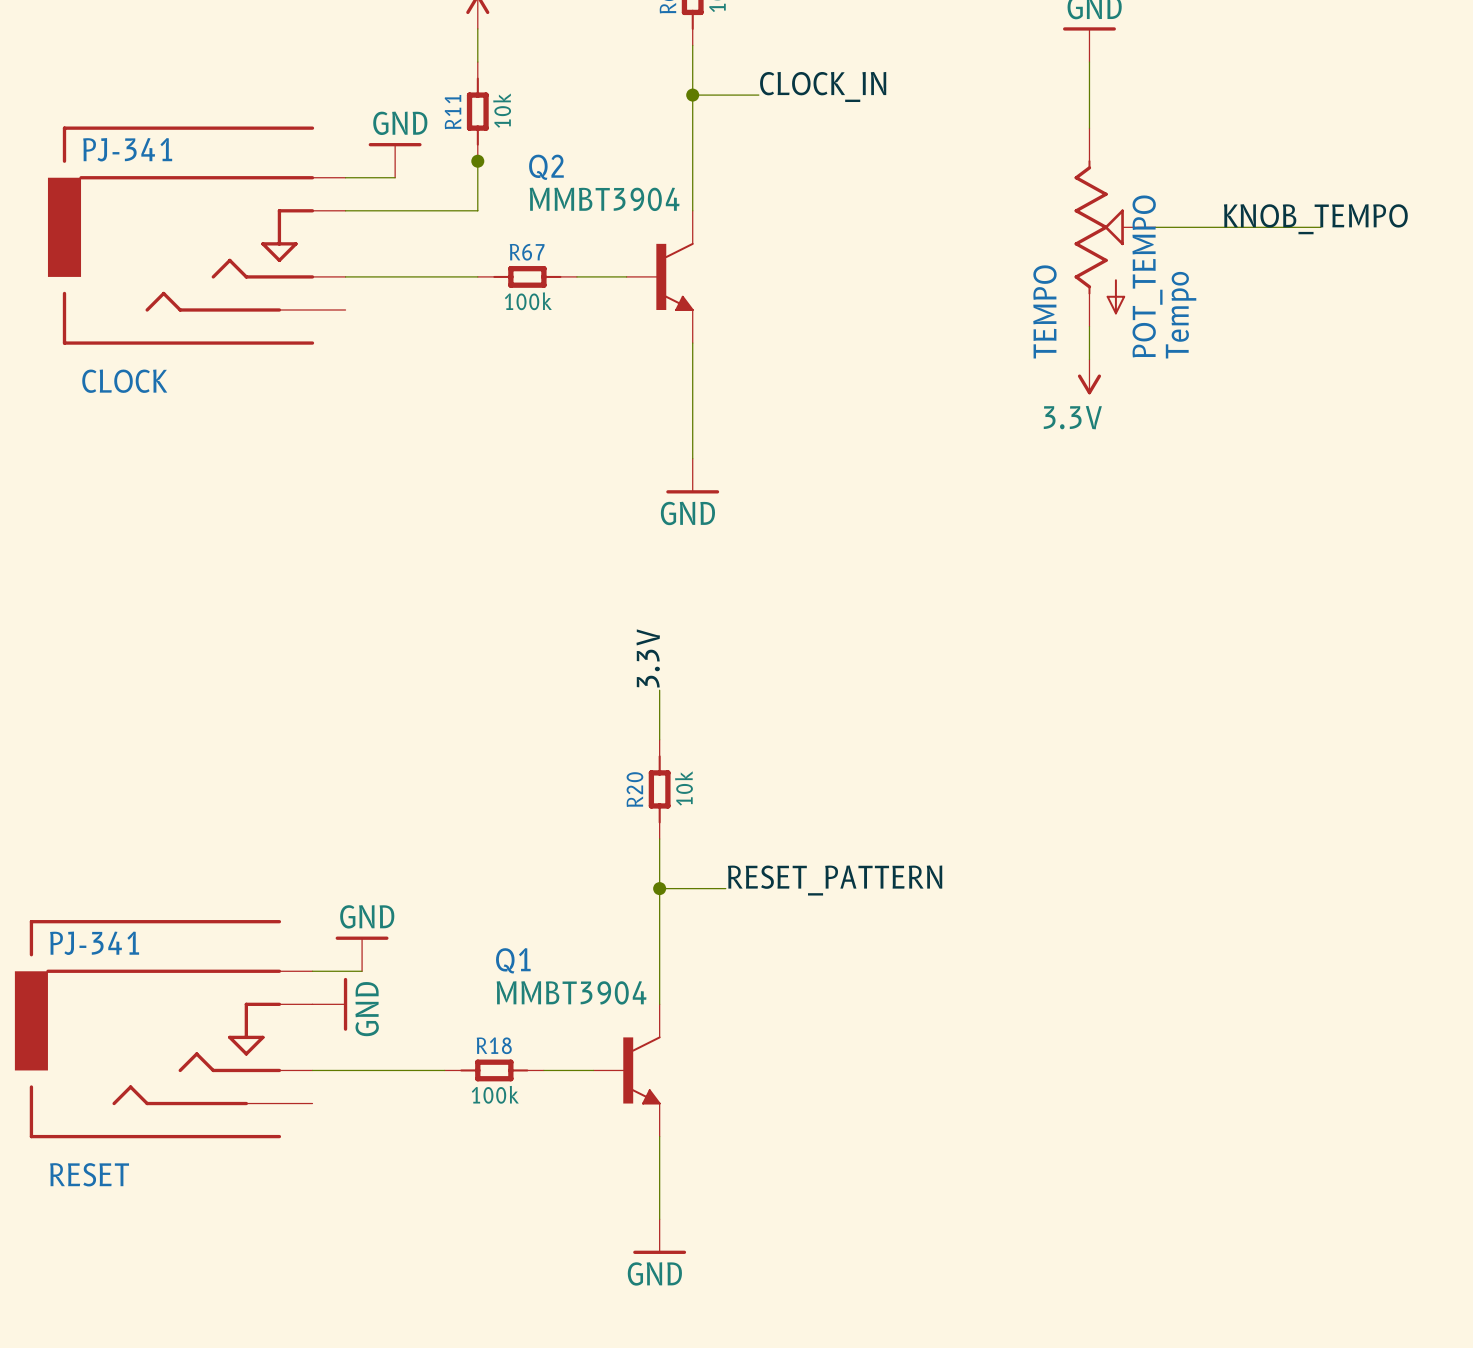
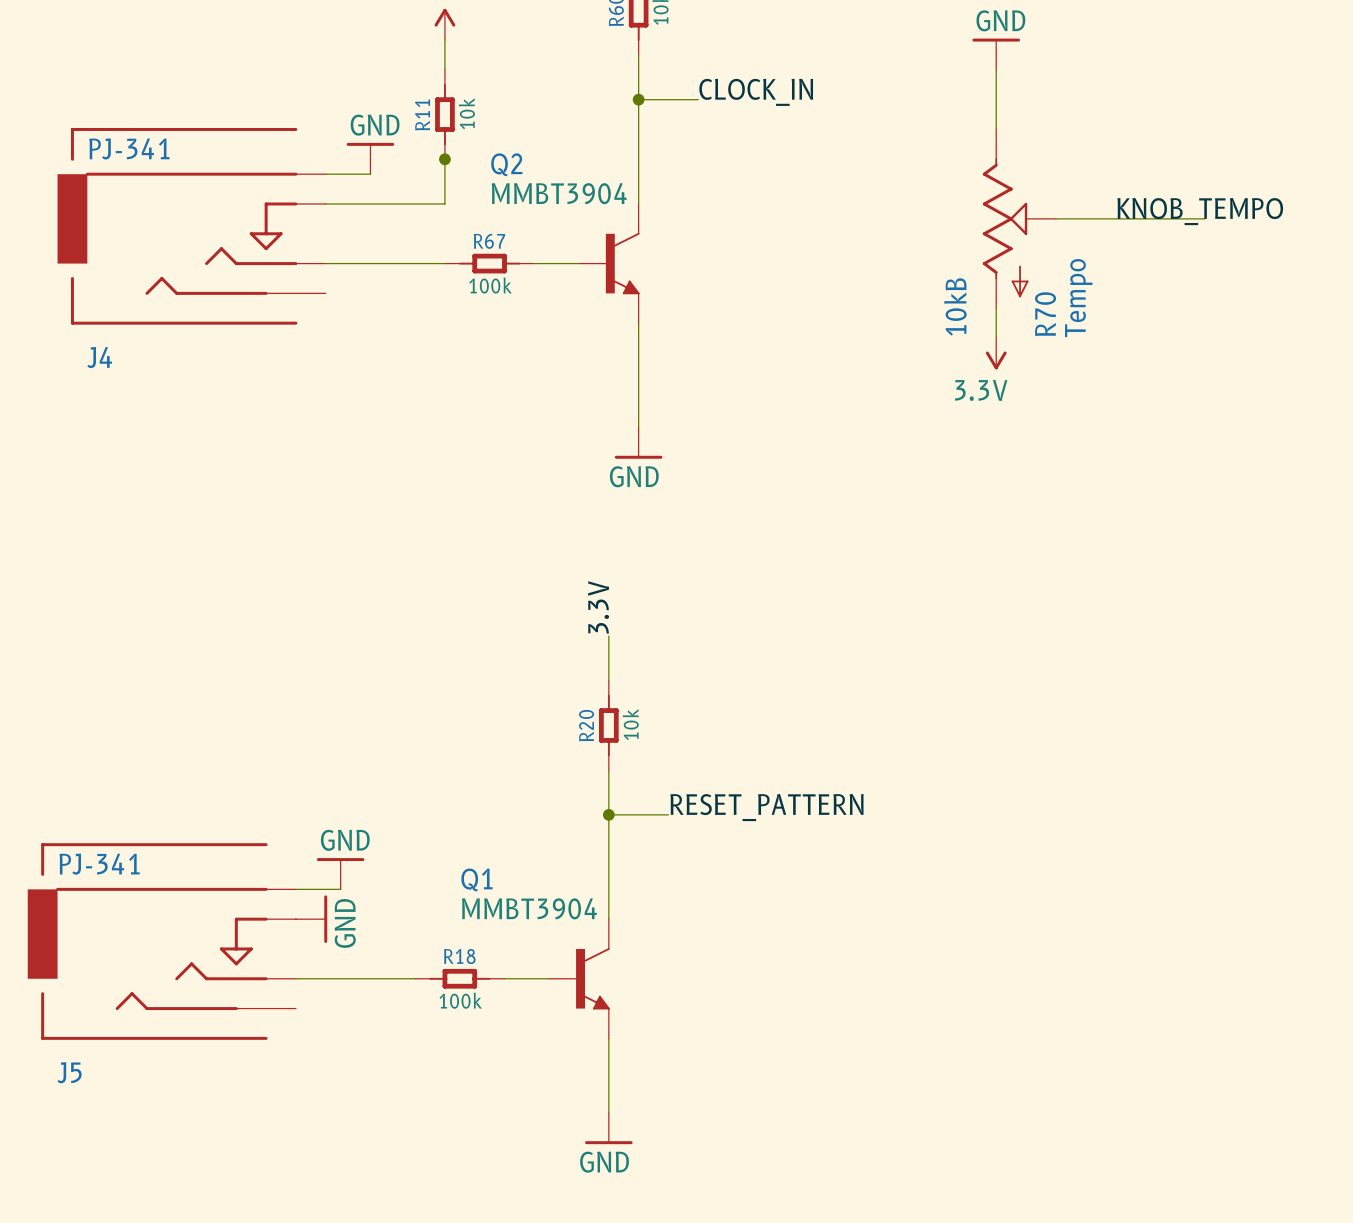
POT_TEMPO name: POT_TEMPO (1147, 276) -> R70 (1045, 314)
POT_TEMPO value: TEMPO (1044, 311) -> 10kB (955, 306)
CLOCK name: CLOCK (124, 381) -> J4 (99, 357)
RESET name: RESET (89, 1174) -> J5 (69, 1072)

